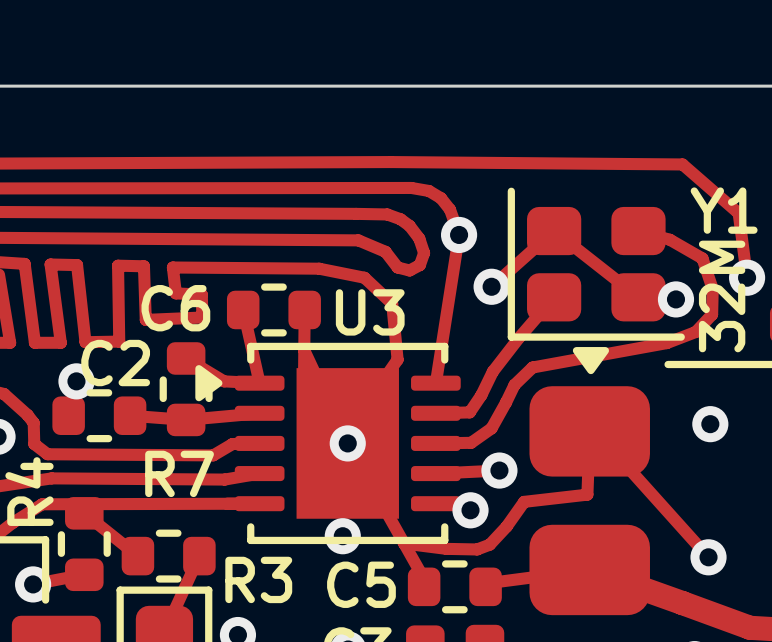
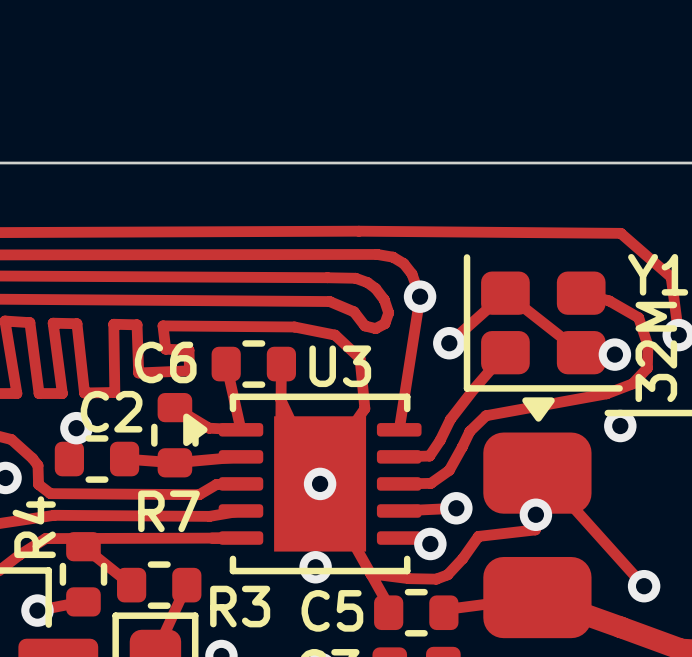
via position: (710, 424) -> (620, 426)
via: none -> (535, 514)

